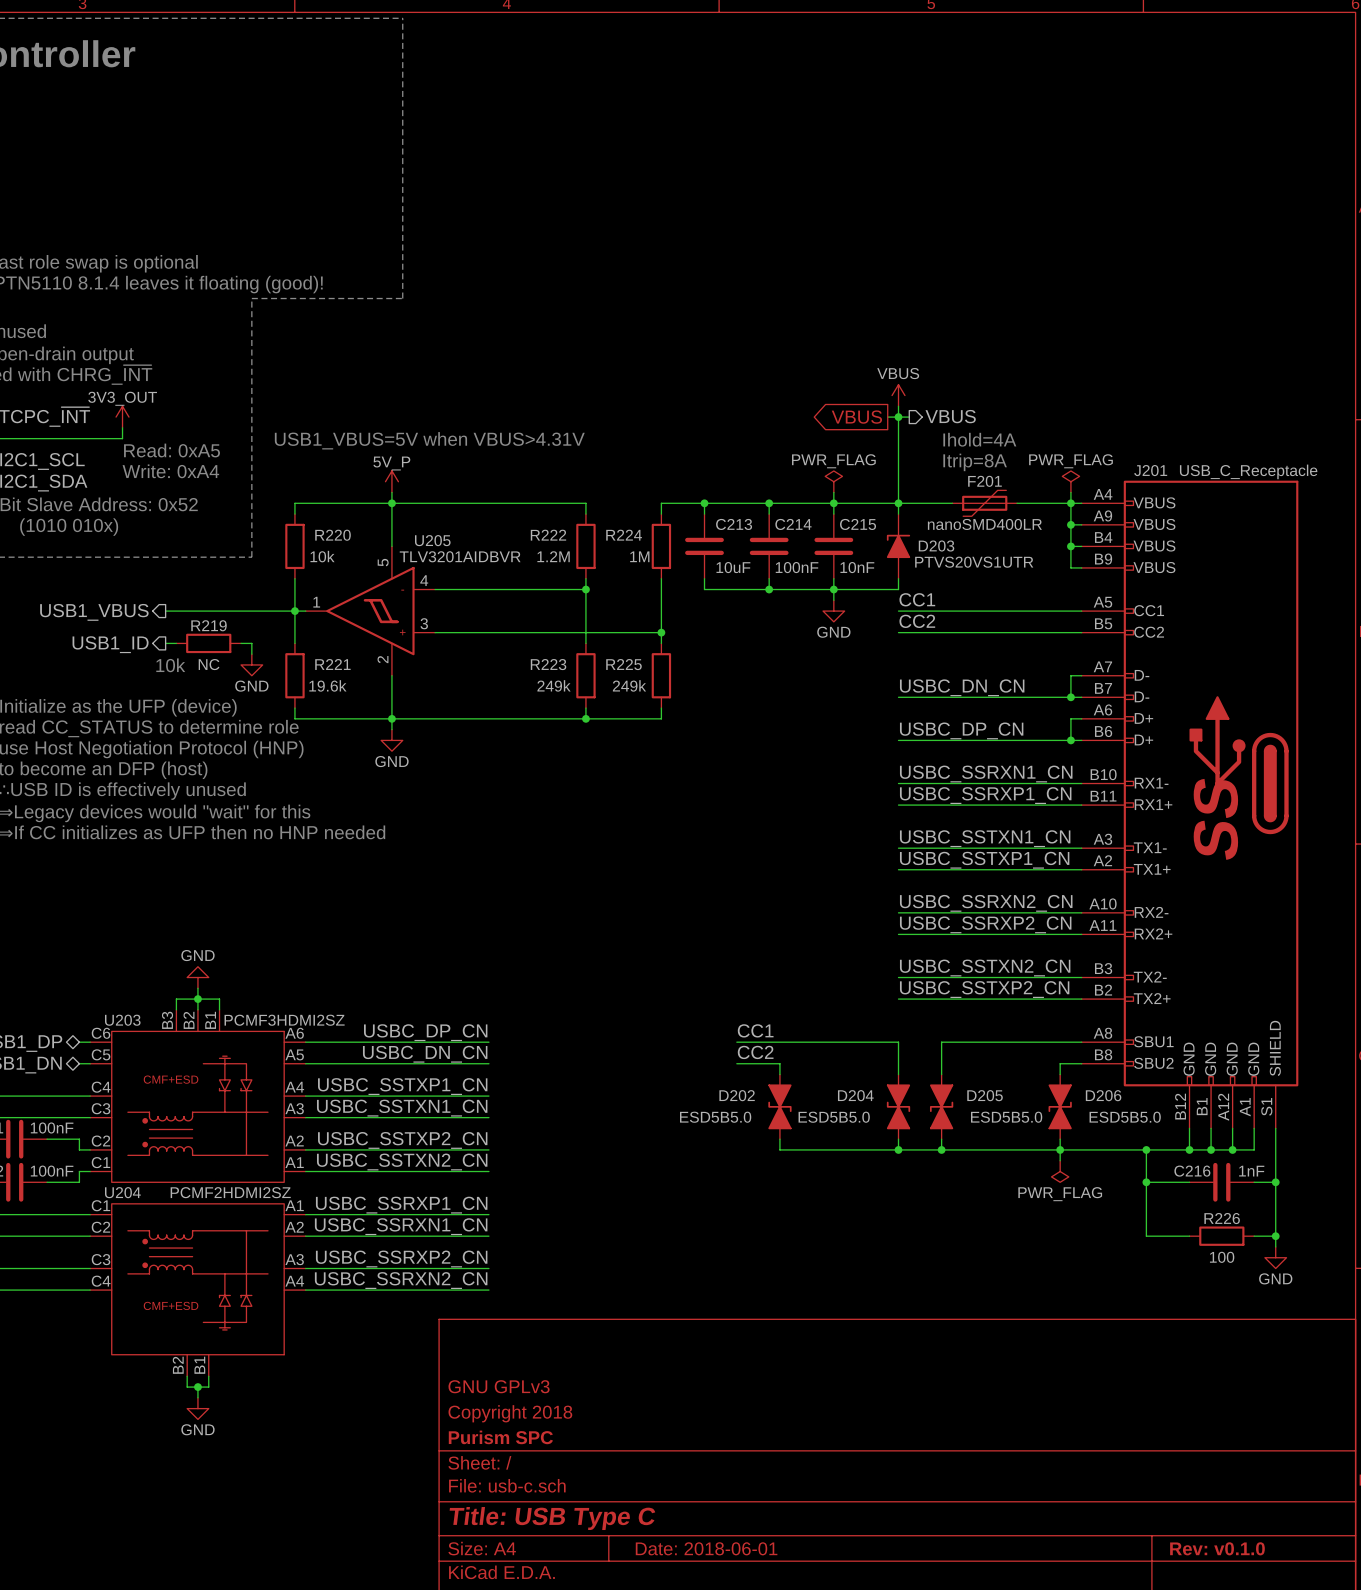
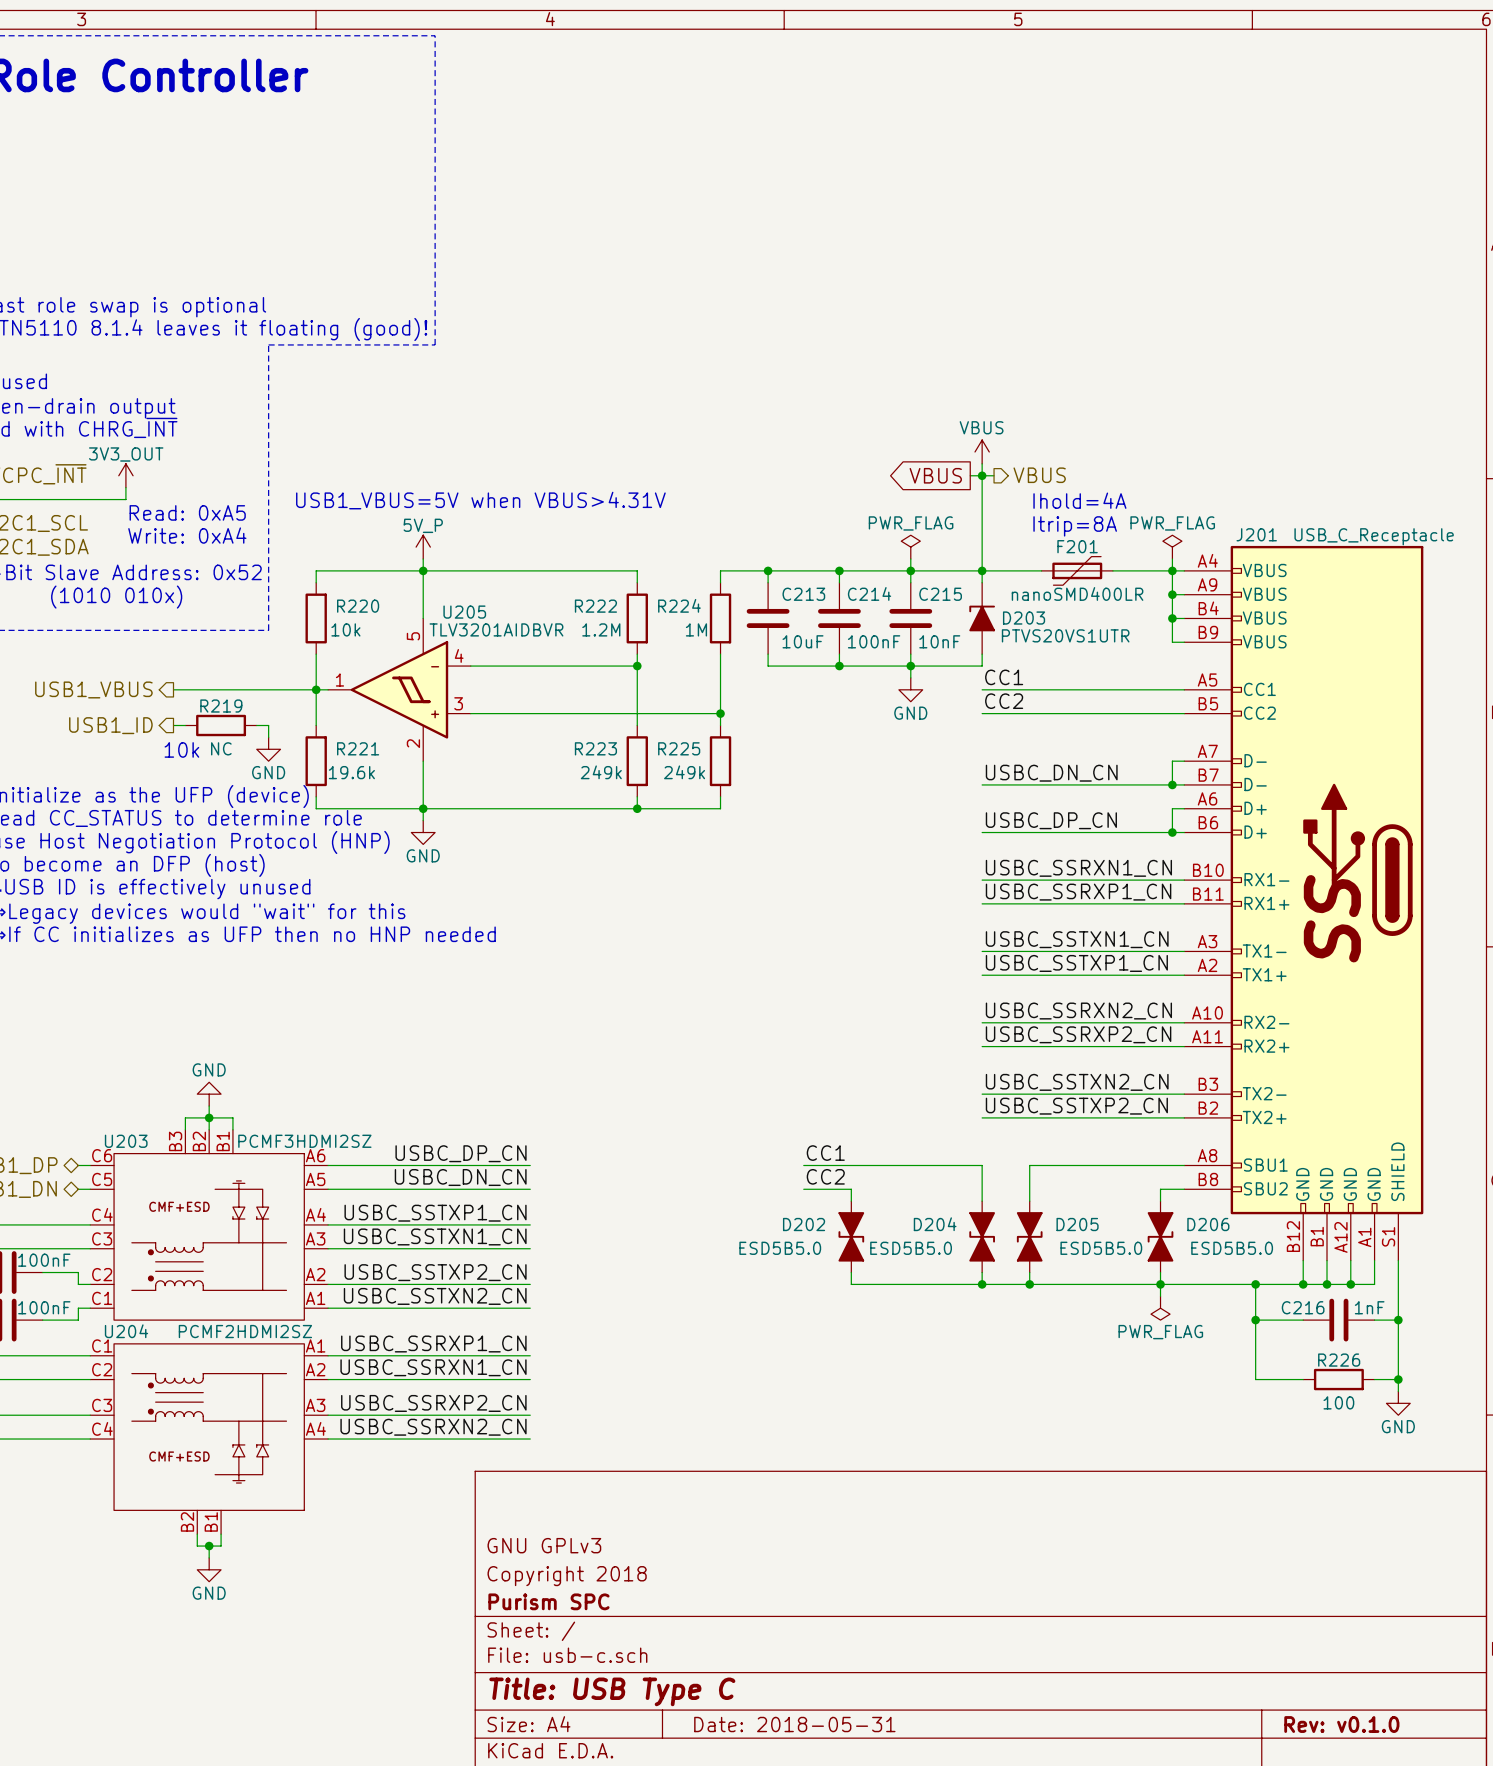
title block: Date: 2018-06-01 (706, 1548) -> Date: 2018-05-31 (794, 1724)

